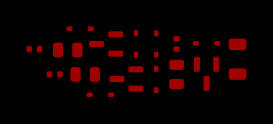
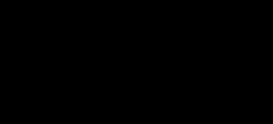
part: (80, 28) -> none
part: (106, 43) -> none
part: (135, 43) -> none
part: (156, 43) -> none
part: (176, 43) -> none
part: (206, 43) -> none
part: (34, 49) -> none
part: (67, 49) -> none
part: (237, 59) -> none
part: (206, 73) -> none
part: (54, 74) -> none
part: (85, 74) -> none
part: (176, 74) -> none
part: (126, 79) -> none
part: (156, 79) -> none
part: (100, 94) -> none

